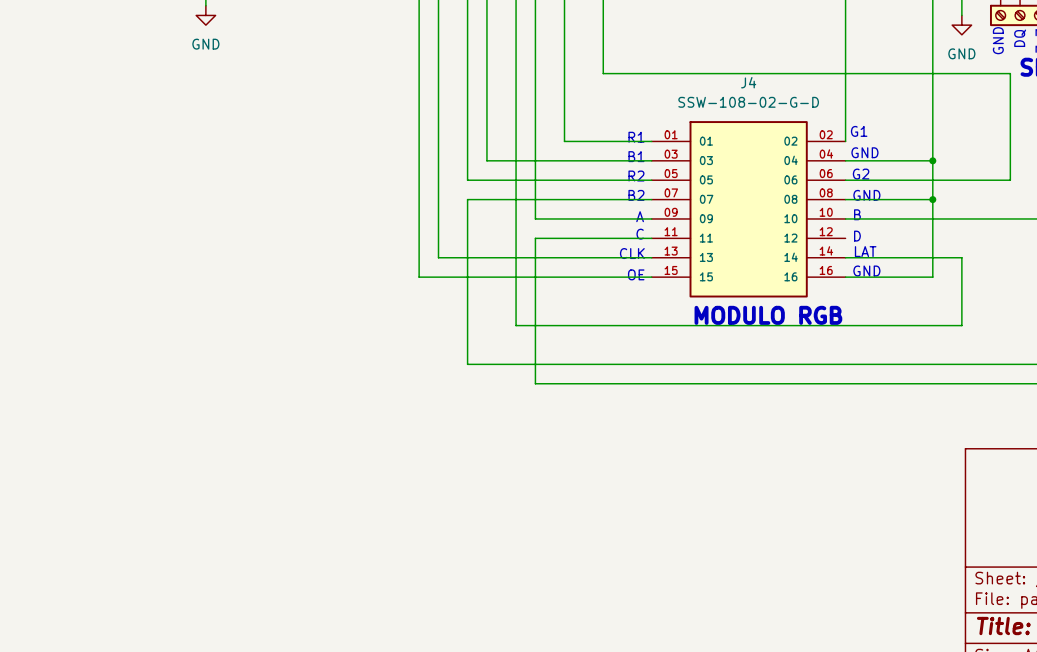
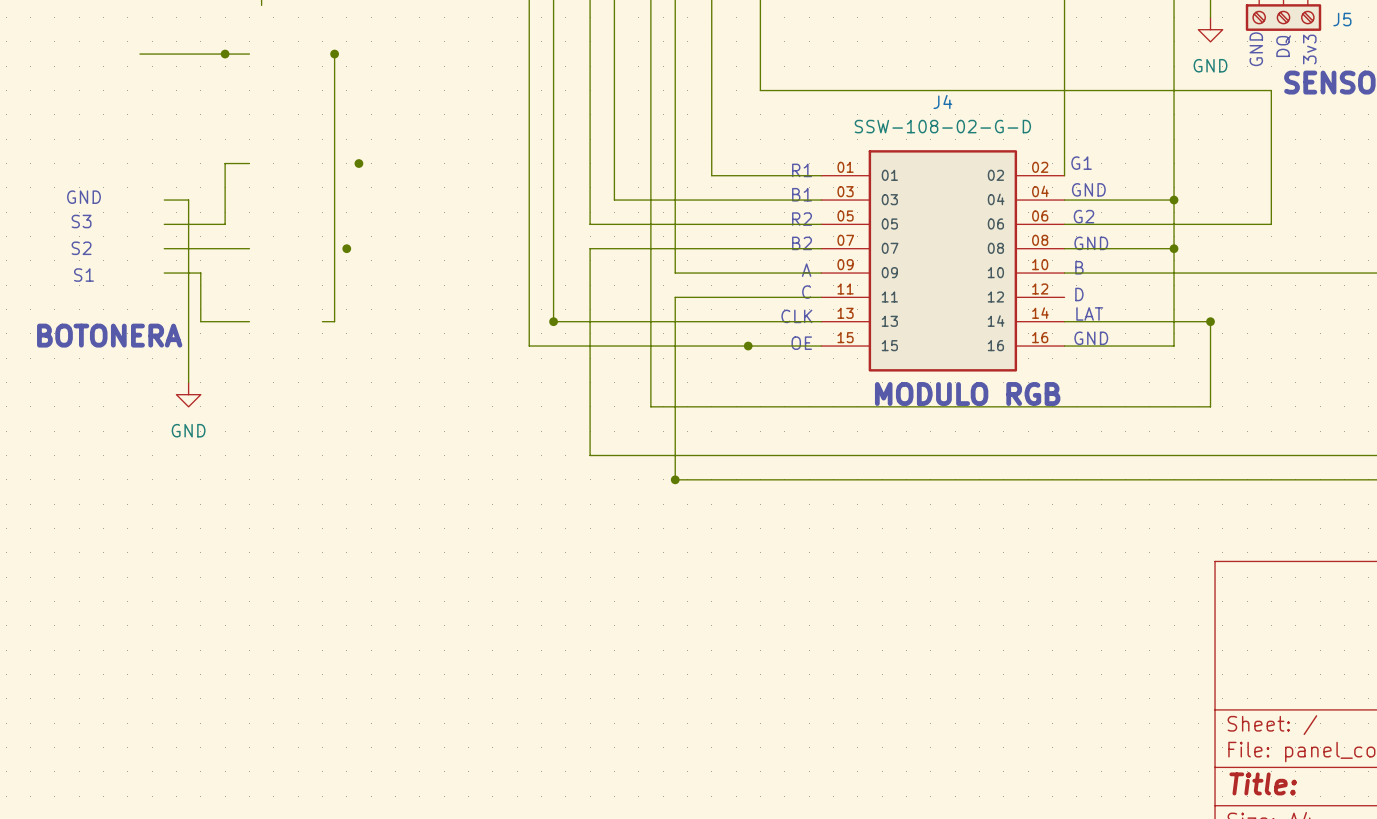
power symbol: GND (205, 15) -> none
wire: none -> (139, 54) (249, 54)
junction: none -> (225, 54)
wire: none -> (334, 54) (334, 321) (322, 321)
junction: none -> (334, 54)
wire: none -> (249, 163) (225, 163) (225, 224) (164, 224)
junction: none -> (358, 163)
text: none -> GND (83, 197)
wire: none -> (164, 200) (188, 200) (188, 382)
text: none -> S3 (81, 221)
text: none -> S2 (81, 248)
wire: none -> (164, 248) (249, 248)
junction: none -> (346, 248)
wire: none -> (164, 273) (200, 273) (200, 321) (249, 321)
text: none -> S1 (83, 275)
junction: none -> (553, 321)
junction: none -> (1210, 321)
text: none -> BOTONERA (109, 335)
junction: none -> (748, 346)
power symbol: none -> GND (188, 394)
junction: none -> (675, 479)

